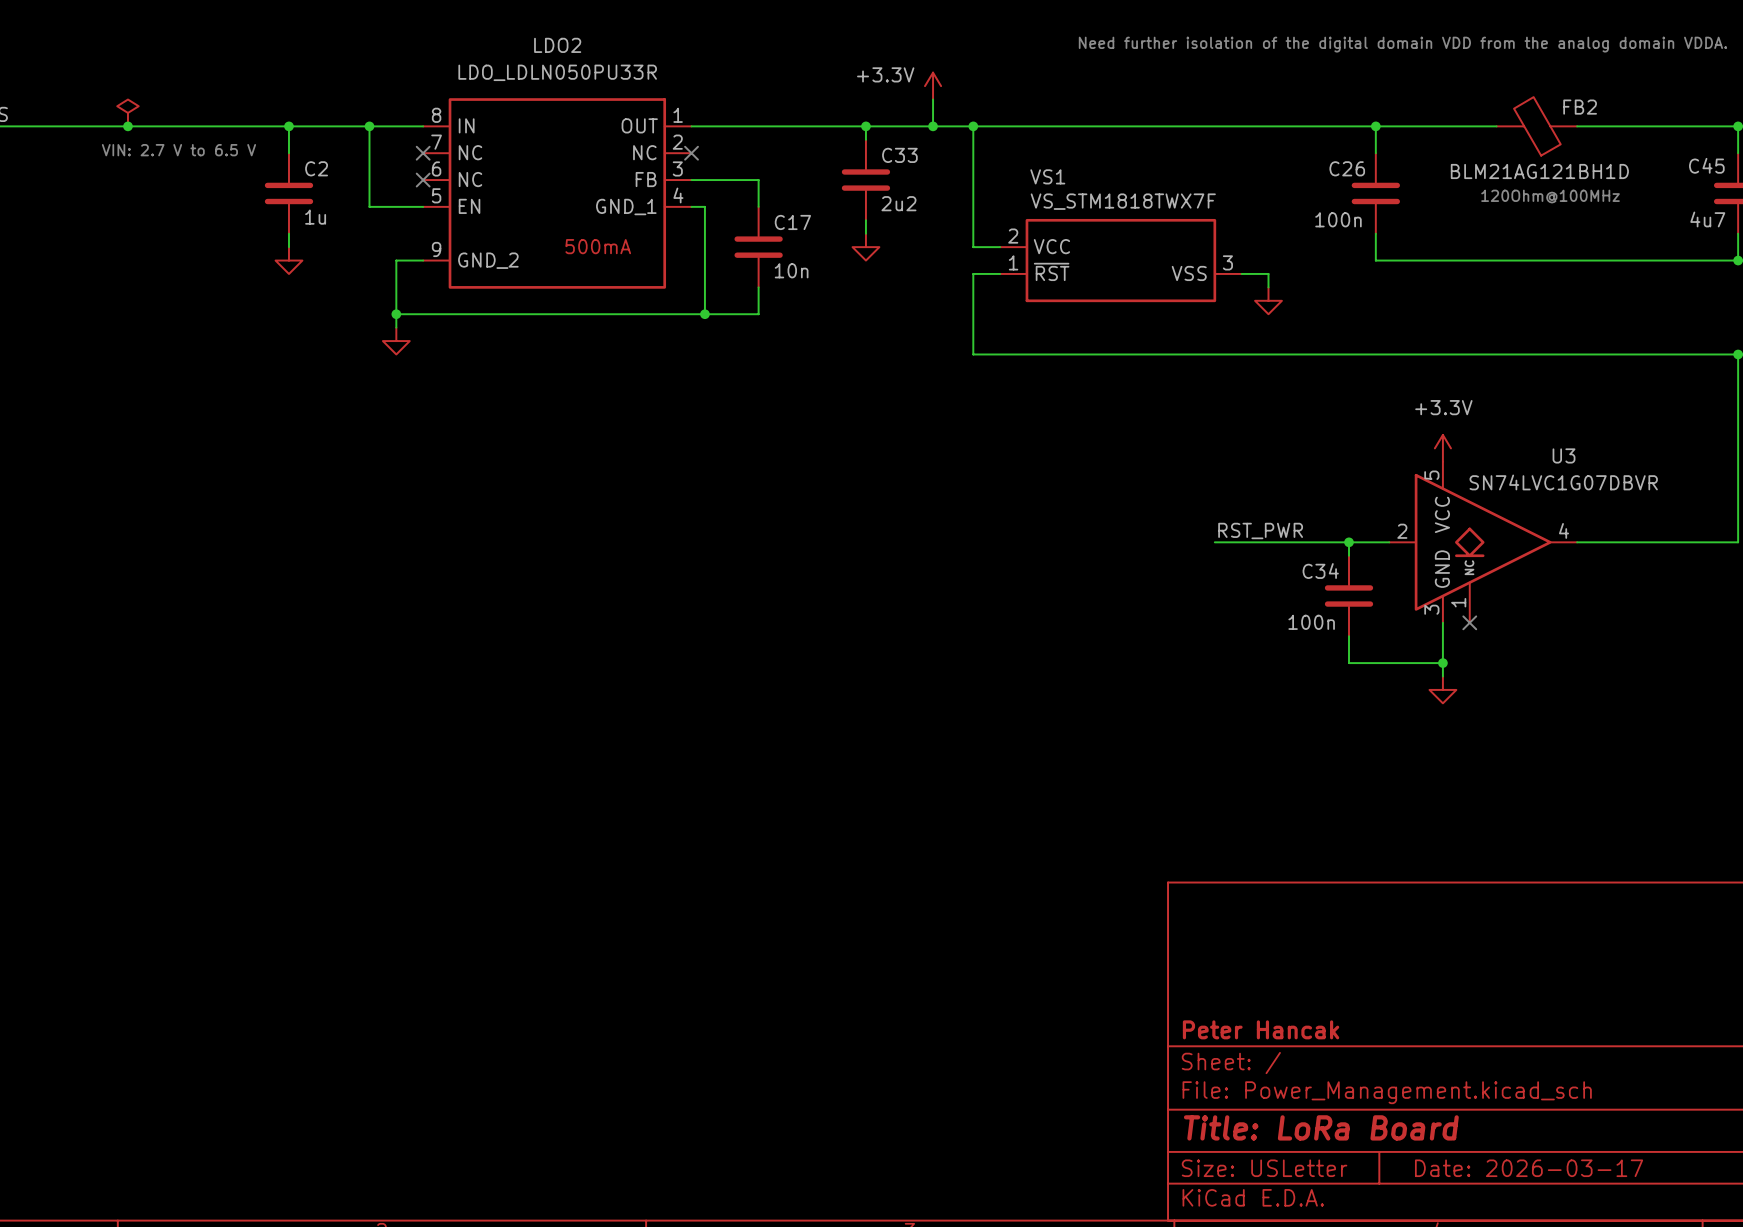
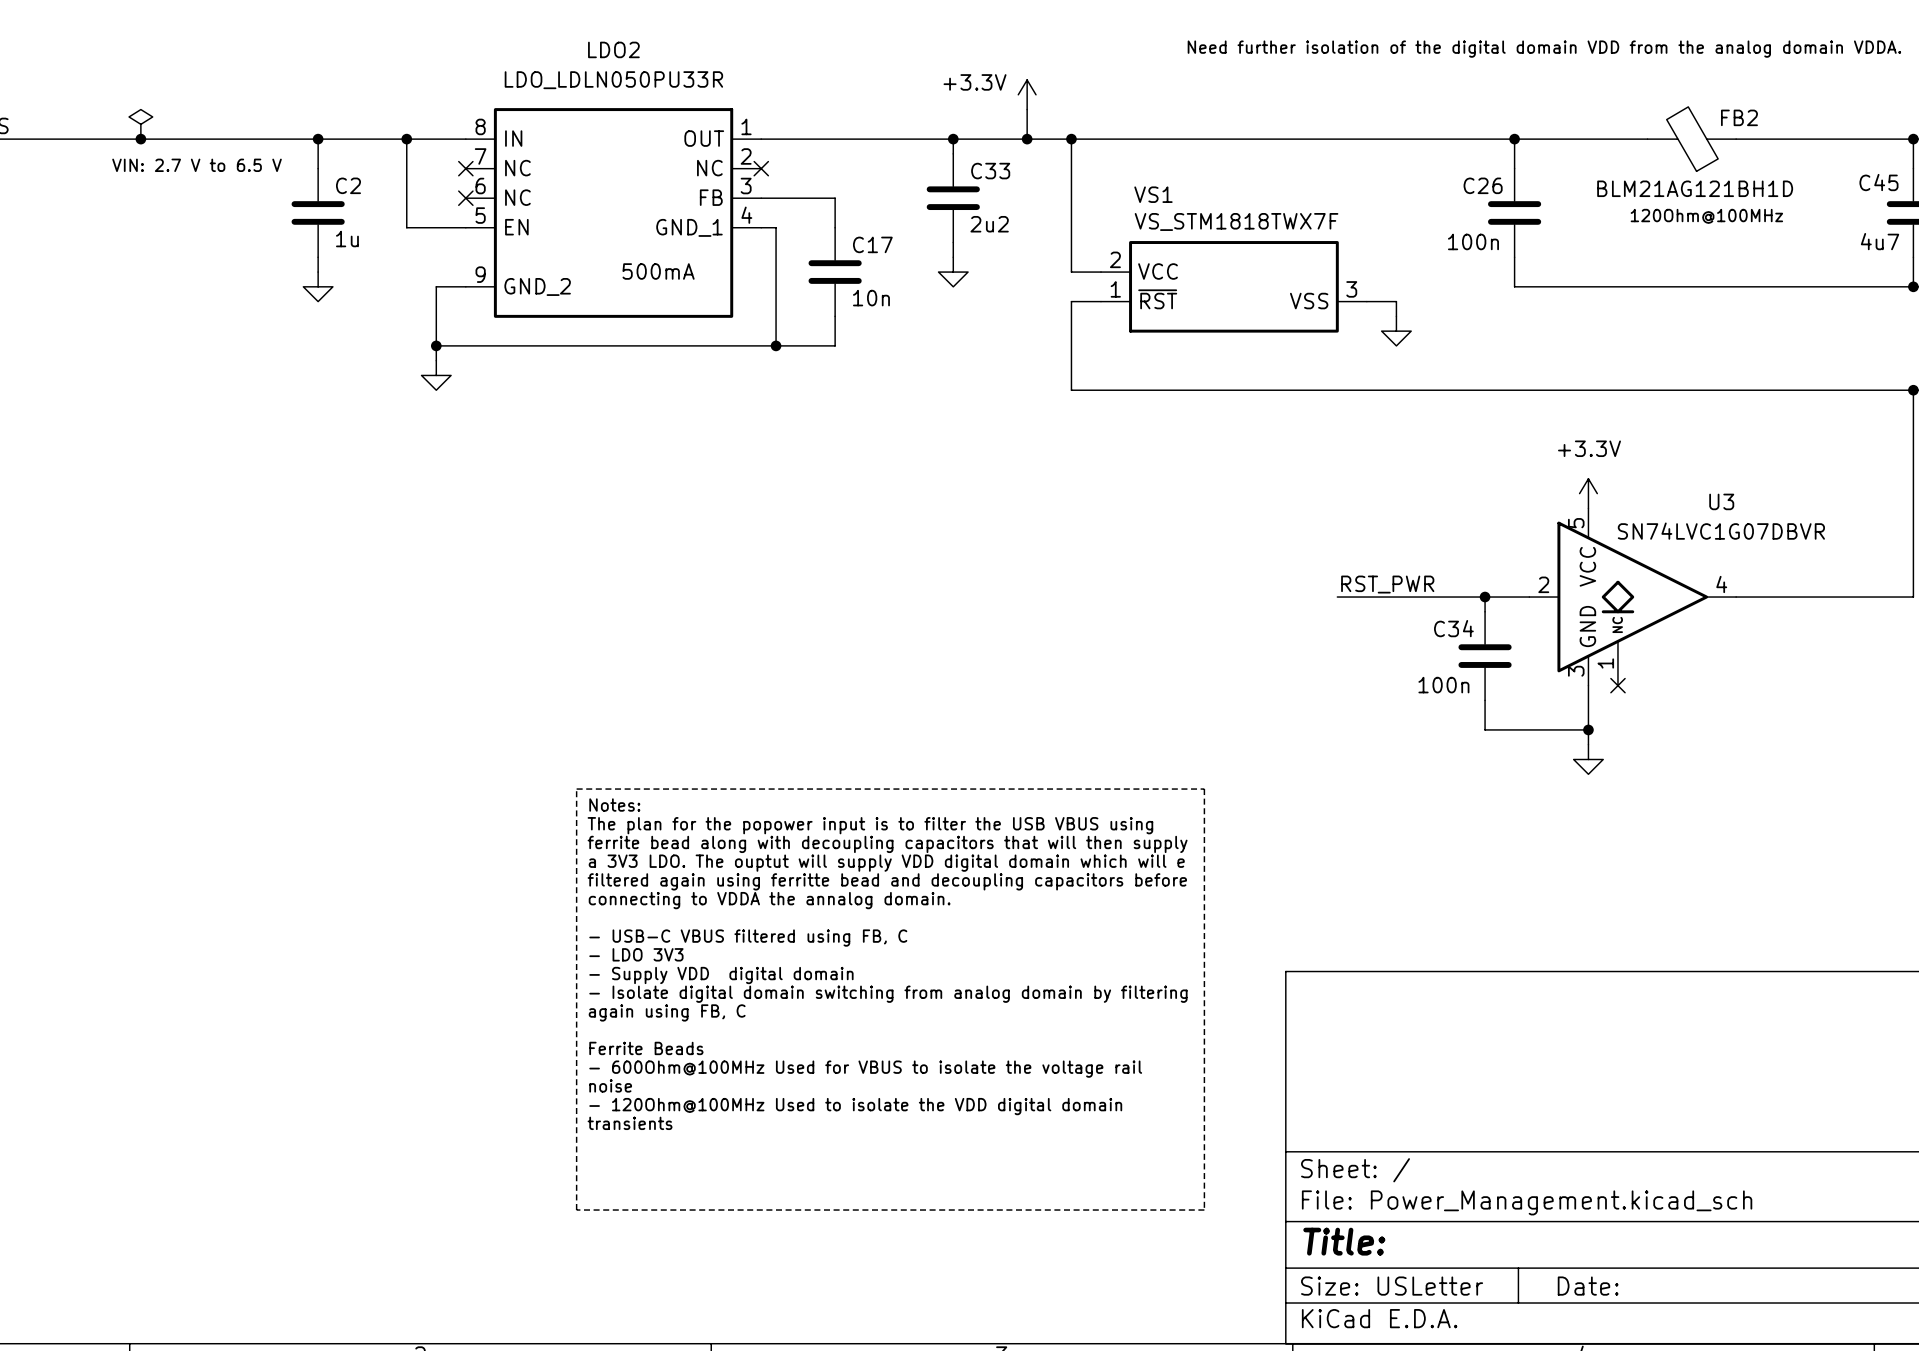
line: none -> (576, 789) (1204, 789) (1204, 1210) (576, 1210) (576, 789)
text: none -> Notes: (614, 805)
text: none -> The plan for the popower input is to filter the USB VBUS using (870, 825)
text: none -> ferrite bead along with decoupling capacitors that will then supply (887, 844)
text: none -> a 3V3 LDO. The ouptut will supply VDD digital domain which will e (886, 863)
text: none -> filtered again using ferritte bead and decoupling capacitors before (887, 881)
text: none -> connecting to VDDA the annalog domain. (769, 900)
text: none -> - USB-C VBUS filtered using FB, C (748, 938)
text: none -> - LDO 3V3 (636, 954)
text: none -> - Supply VDD digital domain (721, 975)
text: none -> - Isolate digital domain switching from analog domain by filtering (888, 994)
text: none -> again using FB, C (667, 1012)
text: none -> Ferrite Beads (646, 1048)
text: none -> - 600Ohm@100MHz Used for VBUS to isolate the voltage rail (865, 1069)
text: none -> noise (610, 1085)
text: none -> - 120Ohm@100MHz Used to isolate the VDD digital domain (855, 1106)
text: none -> transients (630, 1123)
title block: Peter Hancak (1261, 1029) -> none
title block: Title: LoRa Board (1321, 1127) -> Title: (1344, 1241)
title block: Date: 2026-03-17 (1529, 1168) -> Date: (1588, 1286)

